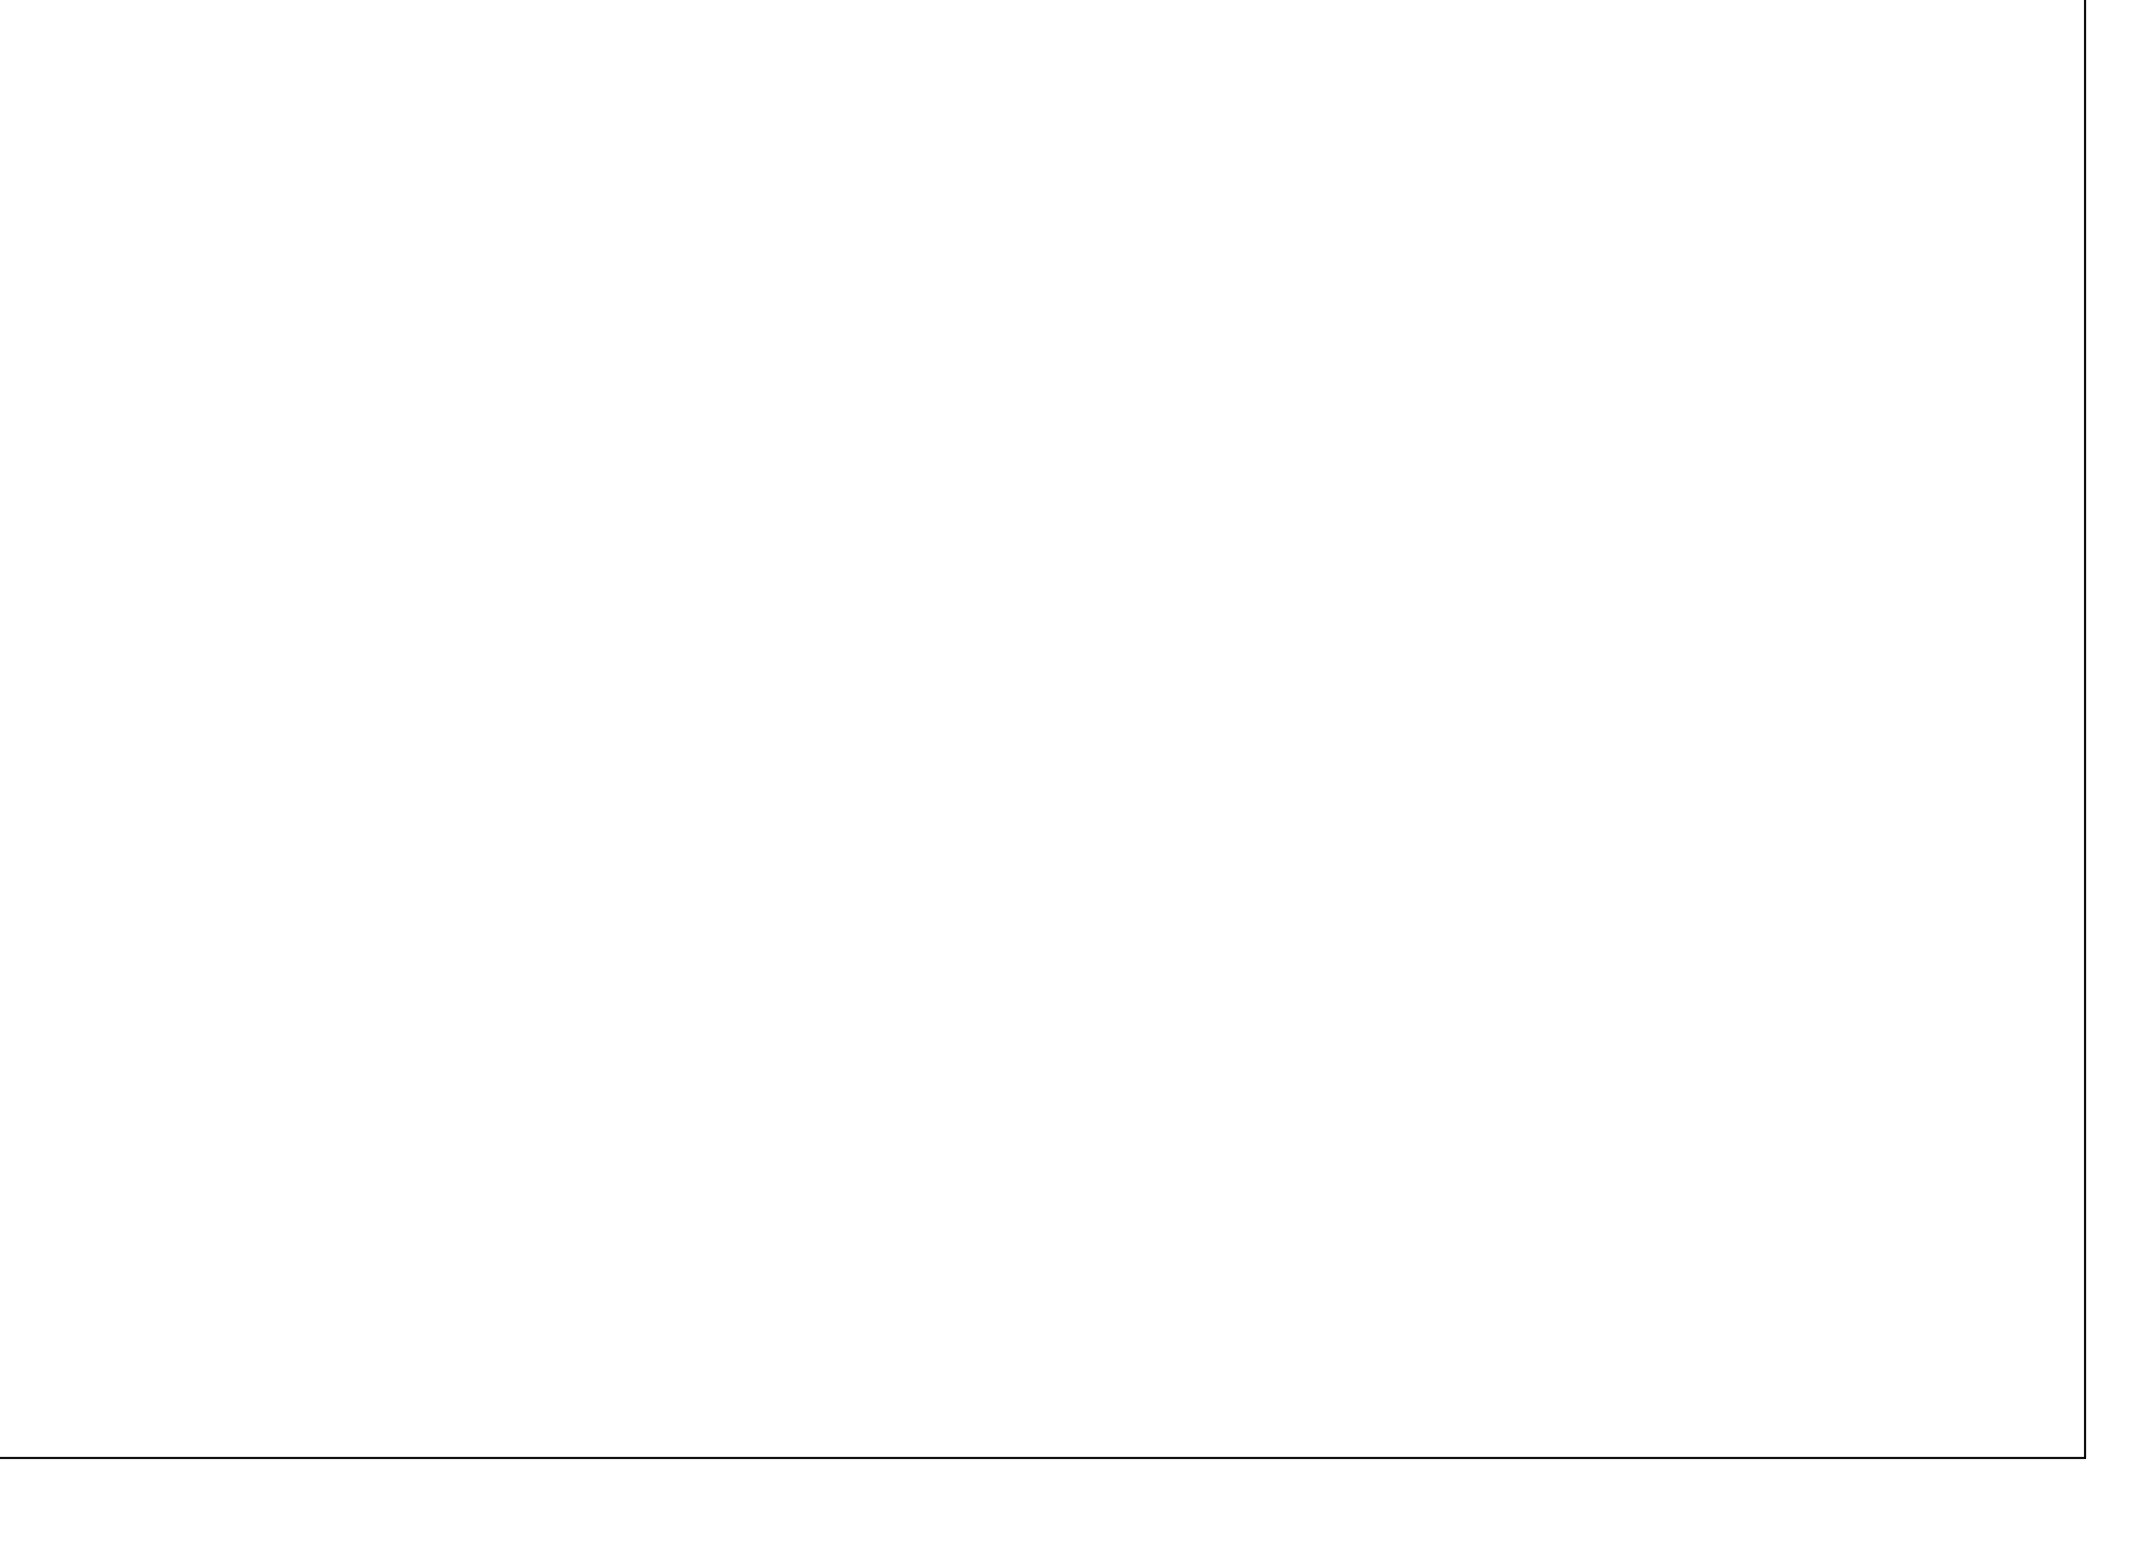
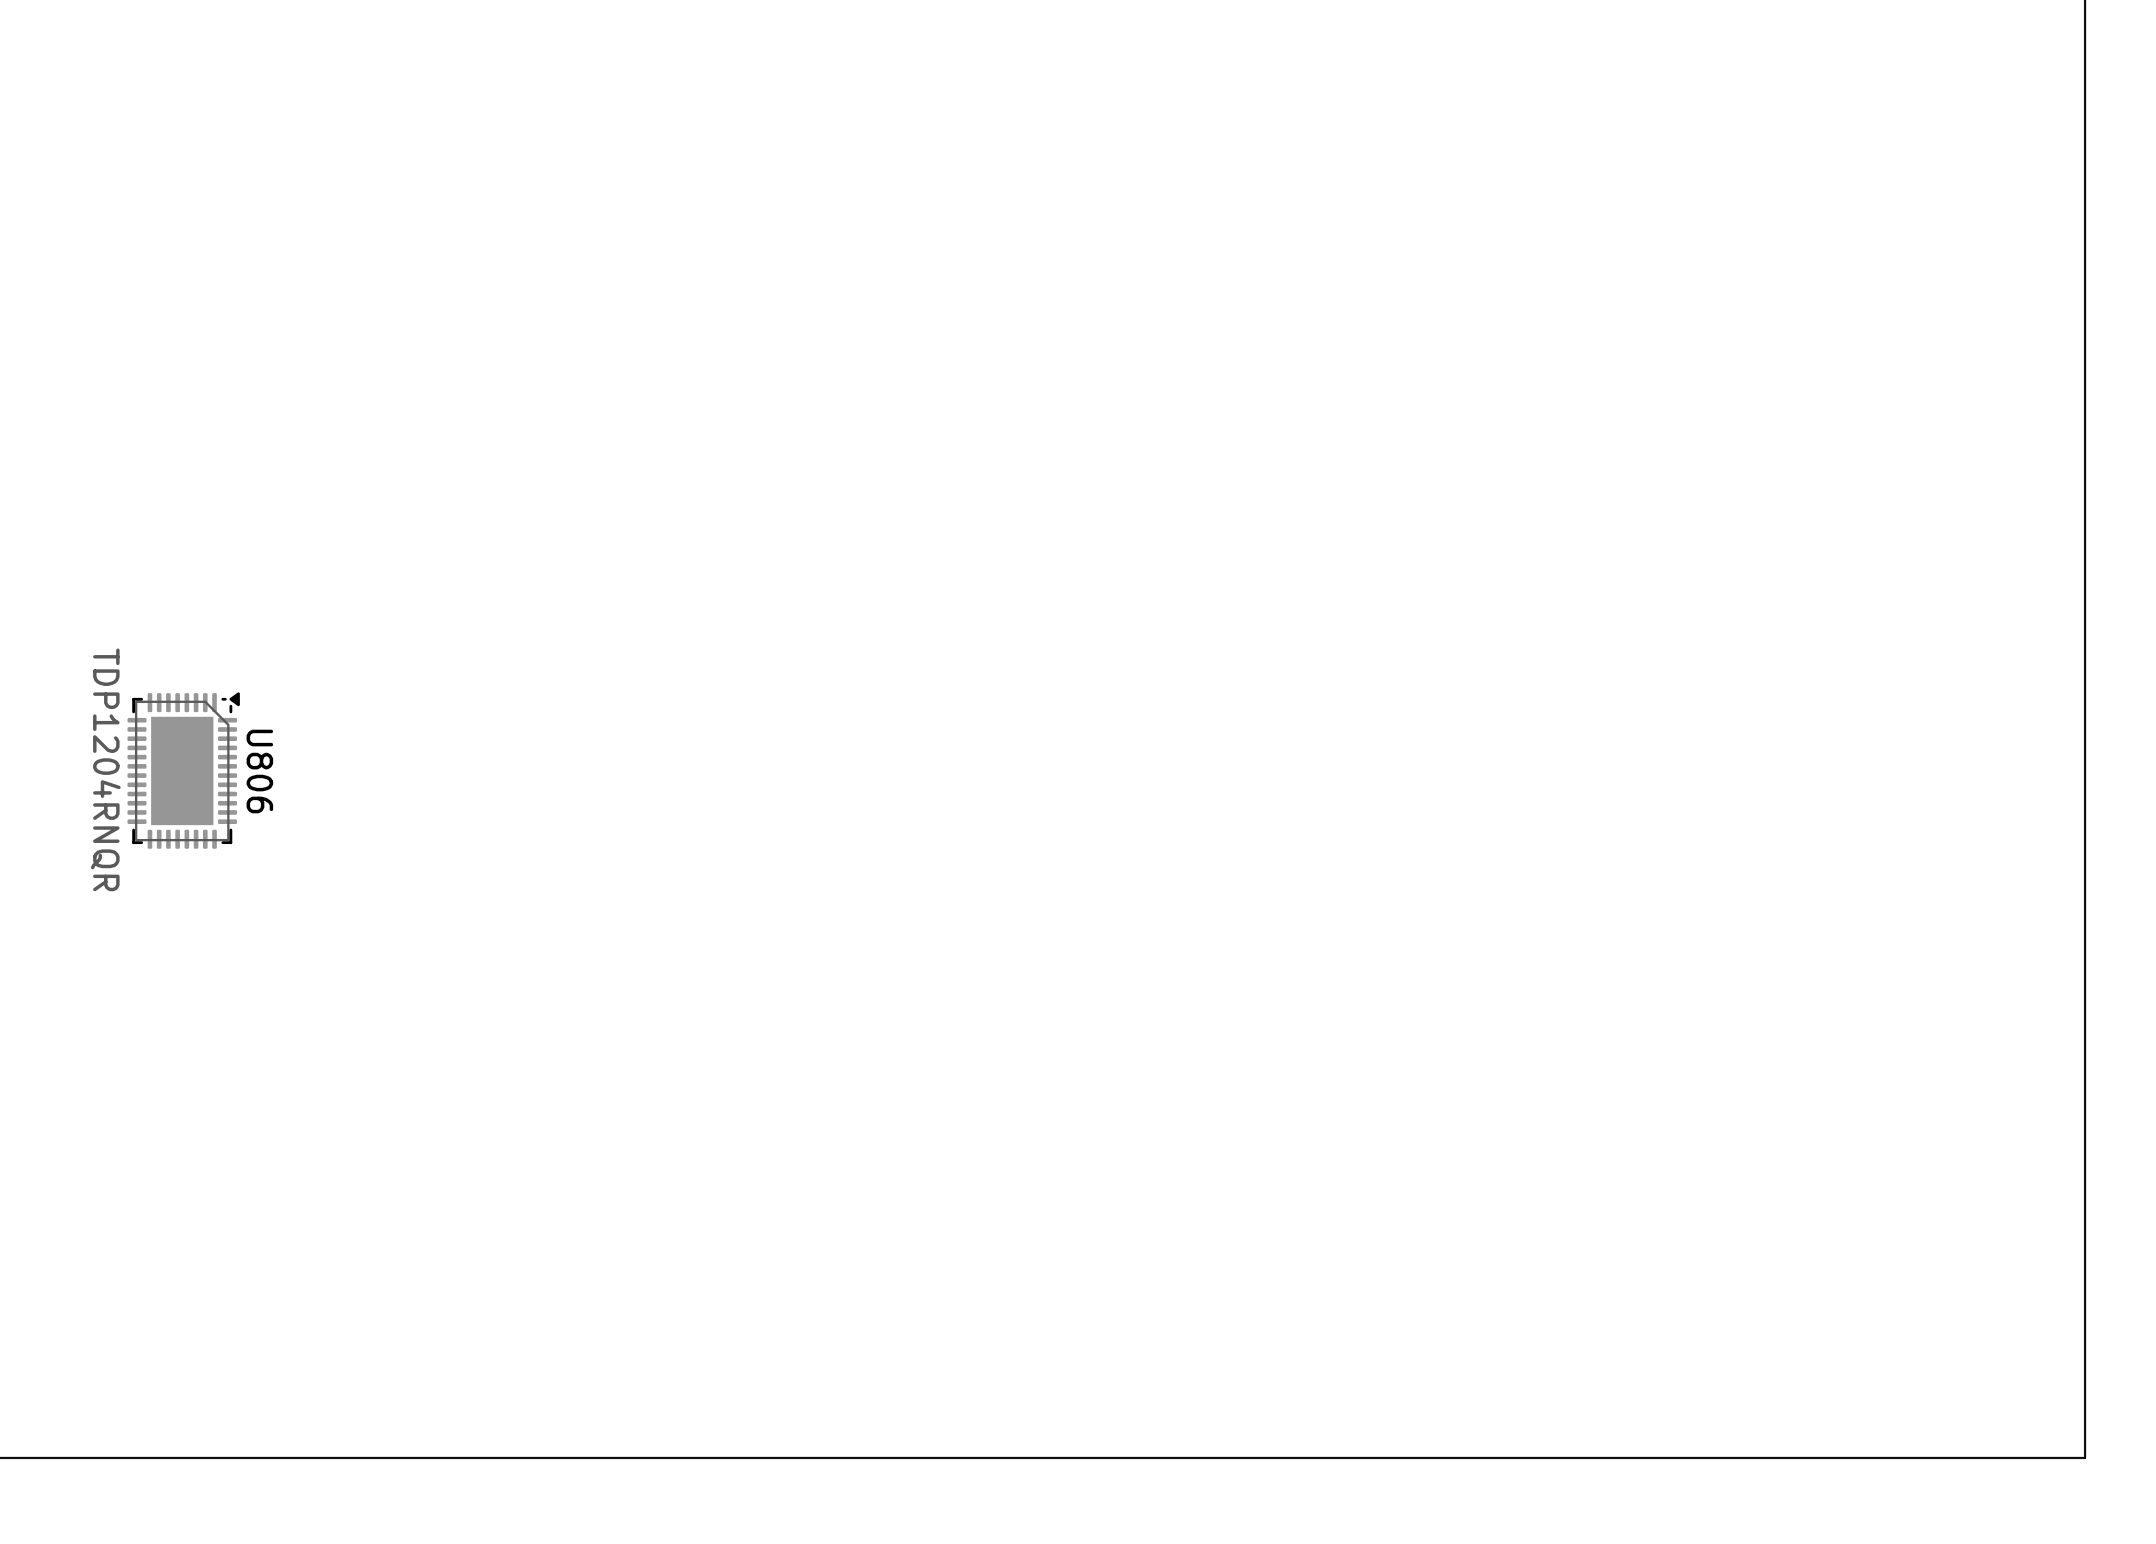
U806: none -> TDP1204RNQR (183, 770)

